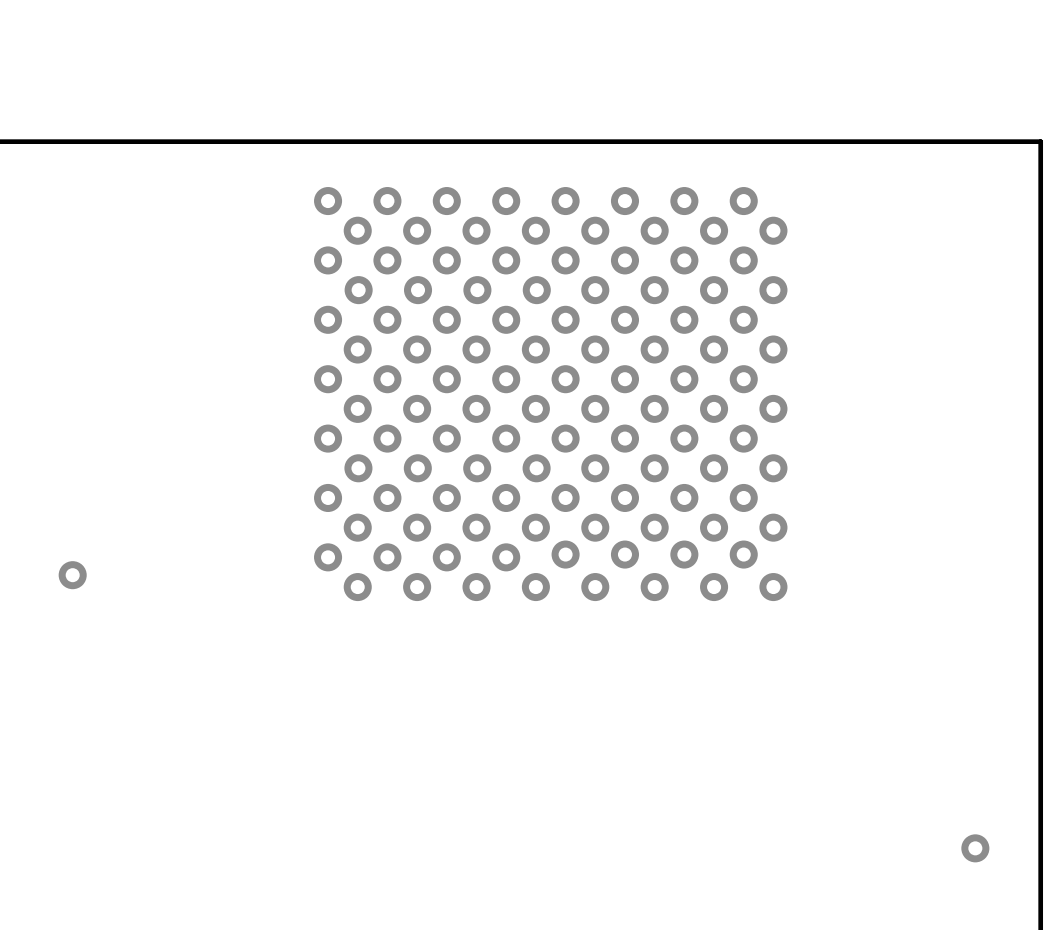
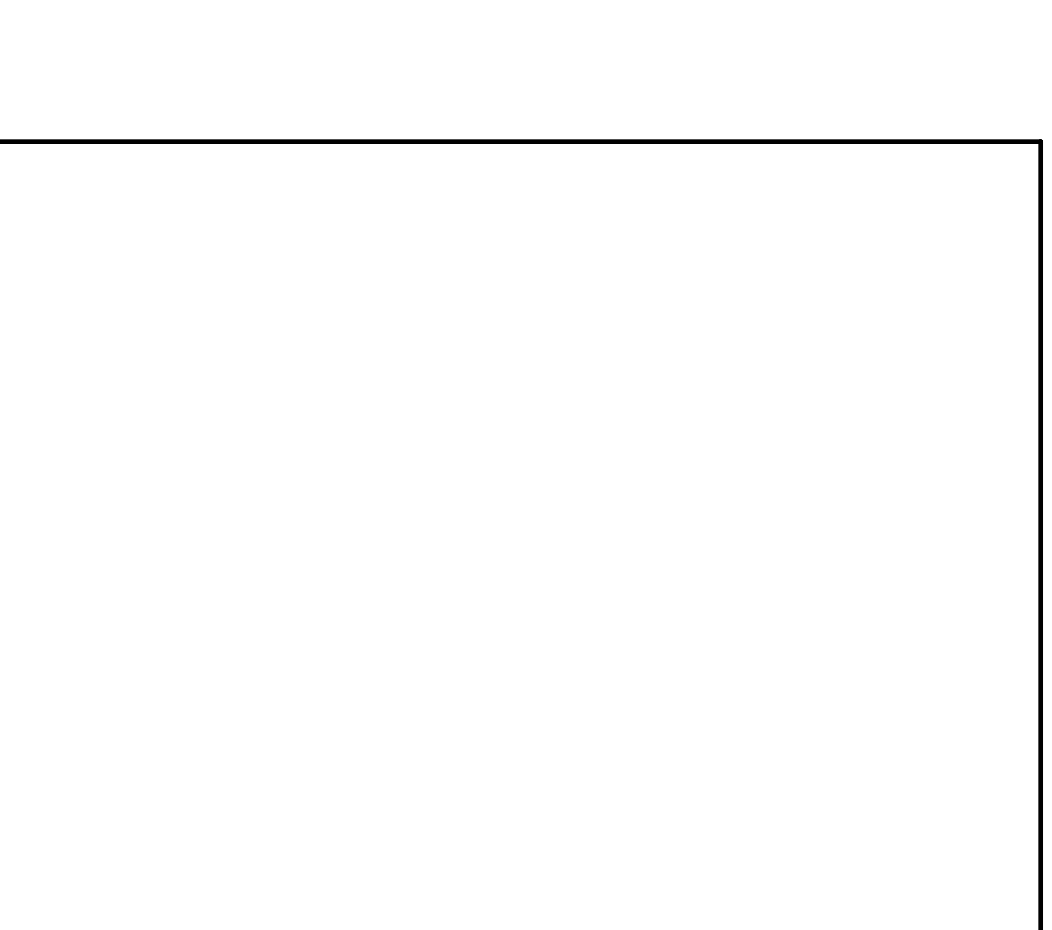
via: (328, 201) -> none
via: (387, 201) -> none
via: (446, 201) -> none
via: (506, 201) -> none
via: (565, 201) -> none
via: (624, 201) -> none
via: (684, 201) -> none
via: (743, 201) -> none
via: (357, 230) -> none
via: (417, 230) -> none
via: (476, 230) -> none
via: (535, 230) -> none
via: (595, 230) -> none
via: (654, 230) -> none
via: (714, 230) -> none
via: (773, 230) -> none
via: (328, 260) -> none
via: (387, 260) -> none
via: (446, 260) -> none
via: (506, 260) -> none
via: (565, 260) -> none
via: (624, 260) -> none
via: (684, 260) -> none
via: (743, 260) -> none
via: (358, 290) -> none
via: (418, 290) -> none
via: (477, 290) -> none
via: (536, 290) -> none
via: (595, 290) -> none
via: (654, 290) -> none
via: (714, 290) -> none
via: (773, 290) -> none
via: (328, 319) -> none
via: (387, 319) -> none
via: (446, 319) -> none
via: (506, 319) -> none
via: (565, 319) -> none
via: (624, 319) -> none
via: (684, 319) -> none
via: (743, 319) -> none
via: (357, 349) -> none
via: (417, 349) -> none
via: (476, 349) -> none
via: (535, 349) -> none
via: (595, 349) -> none
via: (654, 349) -> none
via: (714, 349) -> none
via: (773, 349) -> none
via: (328, 379) -> none
via: (387, 379) -> none
via: (446, 379) -> none
via: (506, 379) -> none
via: (565, 379) -> none
via: (624, 379) -> none
via: (684, 379) -> none
via: (743, 379) -> none
via: (357, 408) -> none
via: (417, 408) -> none
via: (476, 408) -> none
via: (535, 408) -> none
via: (595, 408) -> none
via: (654, 408) -> none
via: (714, 408) -> none
via: (773, 408) -> none
via: (328, 438) -> none
via: (387, 438) -> none
via: (446, 438) -> none
via: (506, 438) -> none
via: (565, 438) -> none
via: (624, 438) -> none
via: (684, 438) -> none
via: (743, 438) -> none
via: (358, 468) -> none
via: (417, 468) -> none
via: (477, 468) -> none
via: (536, 468) -> none
via: (595, 468) -> none
via: (654, 468) -> none
via: (714, 468) -> none
via: (773, 468) -> none
via: (328, 497) -> none
via: (387, 497) -> none
via: (446, 497) -> none
via: (506, 497) -> none
via: (565, 497) -> none
via: (624, 497) -> none
via: (684, 497) -> none
via: (743, 497) -> none
via: (357, 527) -> none
via: (417, 527) -> none
via: (476, 527) -> none
via: (535, 527) -> none
via: (595, 527) -> none
via: (654, 527) -> none
via: (714, 527) -> none
via: (773, 527) -> none
via: (565, 554) -> none
via: (624, 554) -> none
via: (684, 554) -> none
via: (743, 554) -> none
via: (328, 557) -> none
via: (387, 557) -> none
via: (446, 557) -> none
via: (506, 557) -> none
via: (72, 575) -> none
via: (357, 587) -> none
via: (417, 587) -> none
via: (476, 587) -> none
via: (535, 587) -> none
via: (595, 587) -> none
via: (654, 587) -> none
via: (714, 587) -> none
via: (773, 587) -> none
via: (975, 848) -> none

